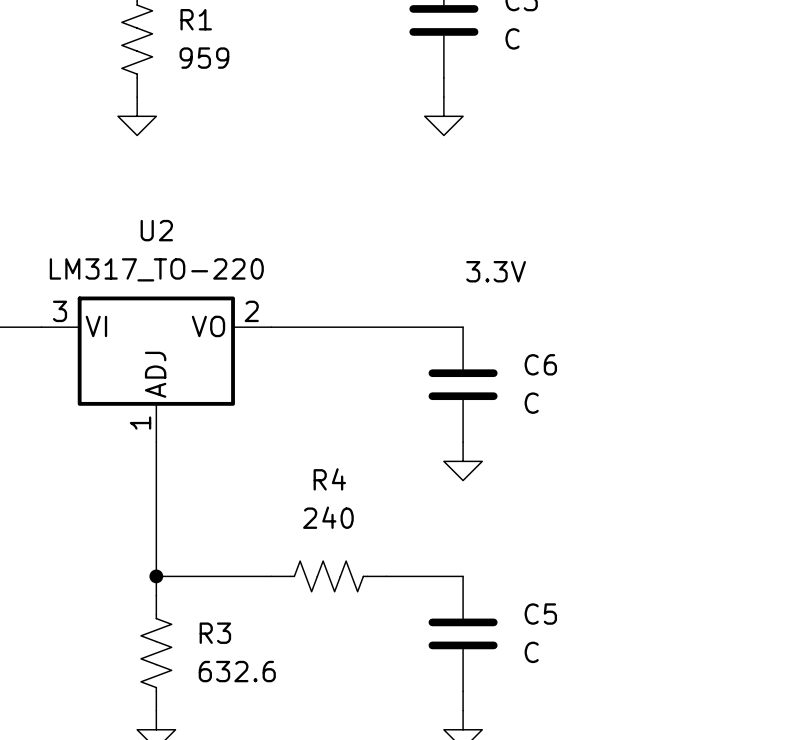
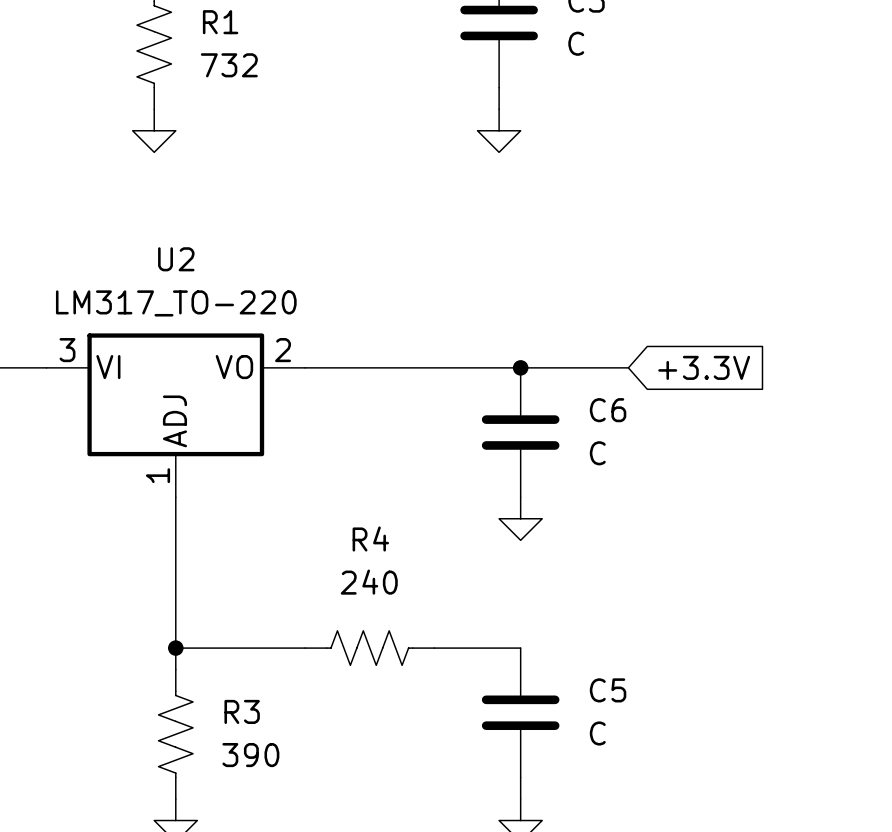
R1 value: 959 (204, 58) -> 732 (229, 65)
label: 3.3V (496, 271) -> none
wire: none -> (520, 367) (628, 367)
junction: none -> (520, 367)
global label: none -> +3.3V (704, 367)
R3 value: 632.6 (237, 671) -> 390 (250, 755)

